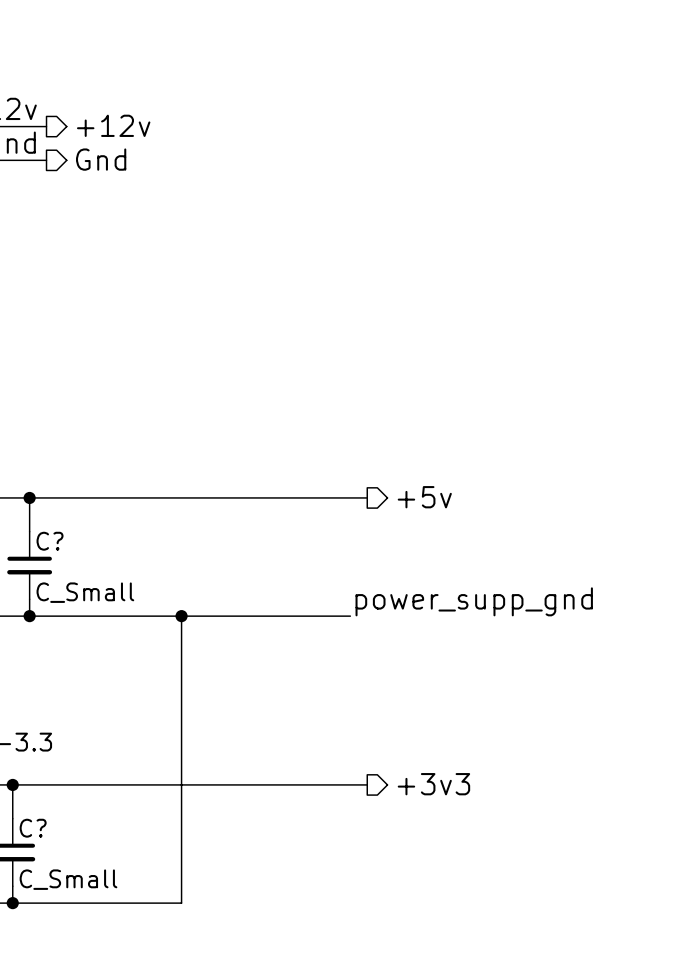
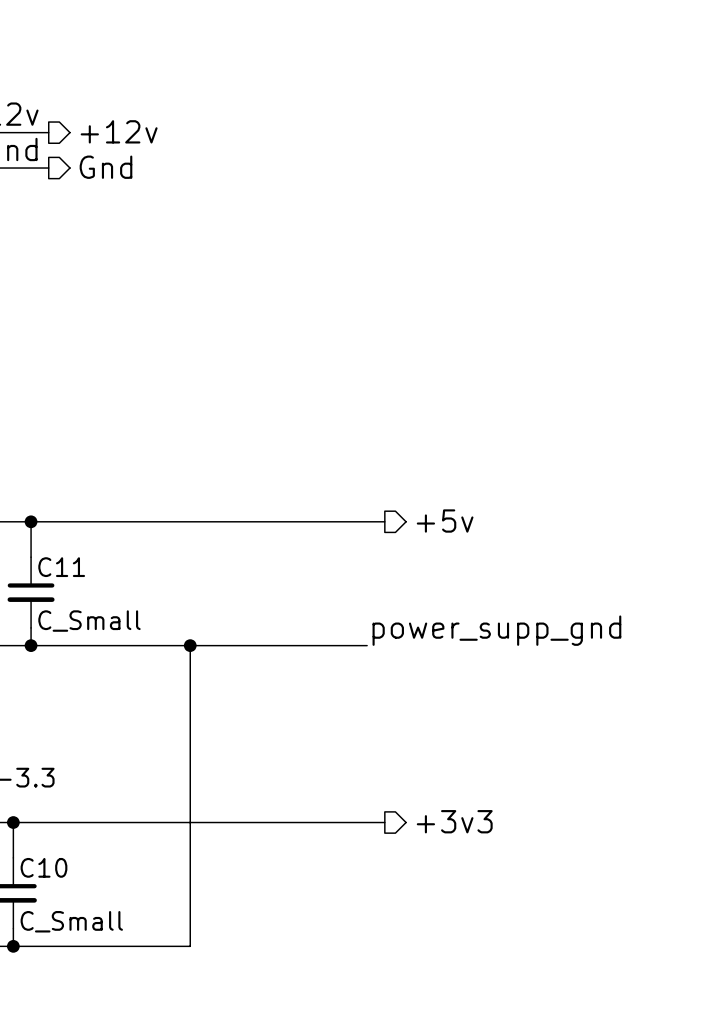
C? name: C? (50, 541) -> C11 (61, 567)
C? name: C? (33, 828) -> C10 (43, 867)

